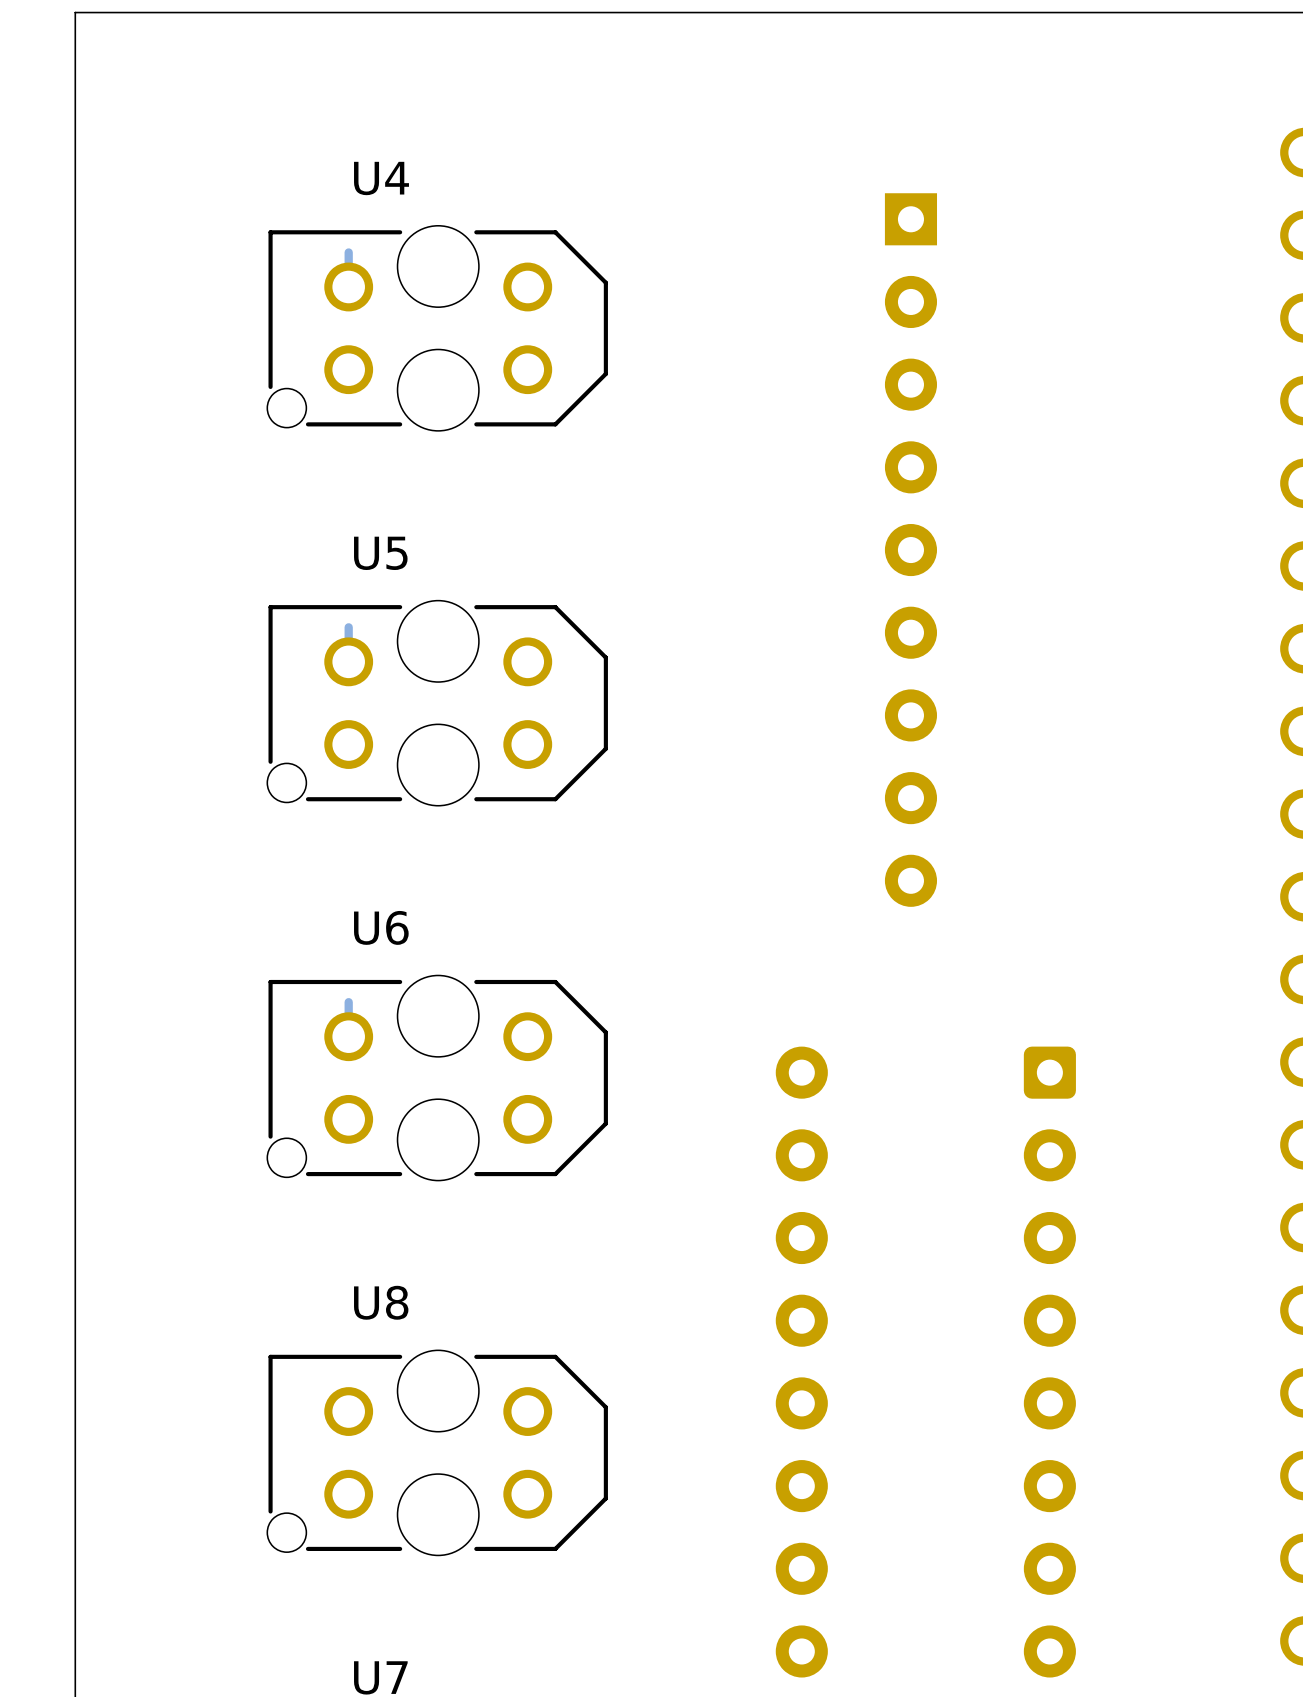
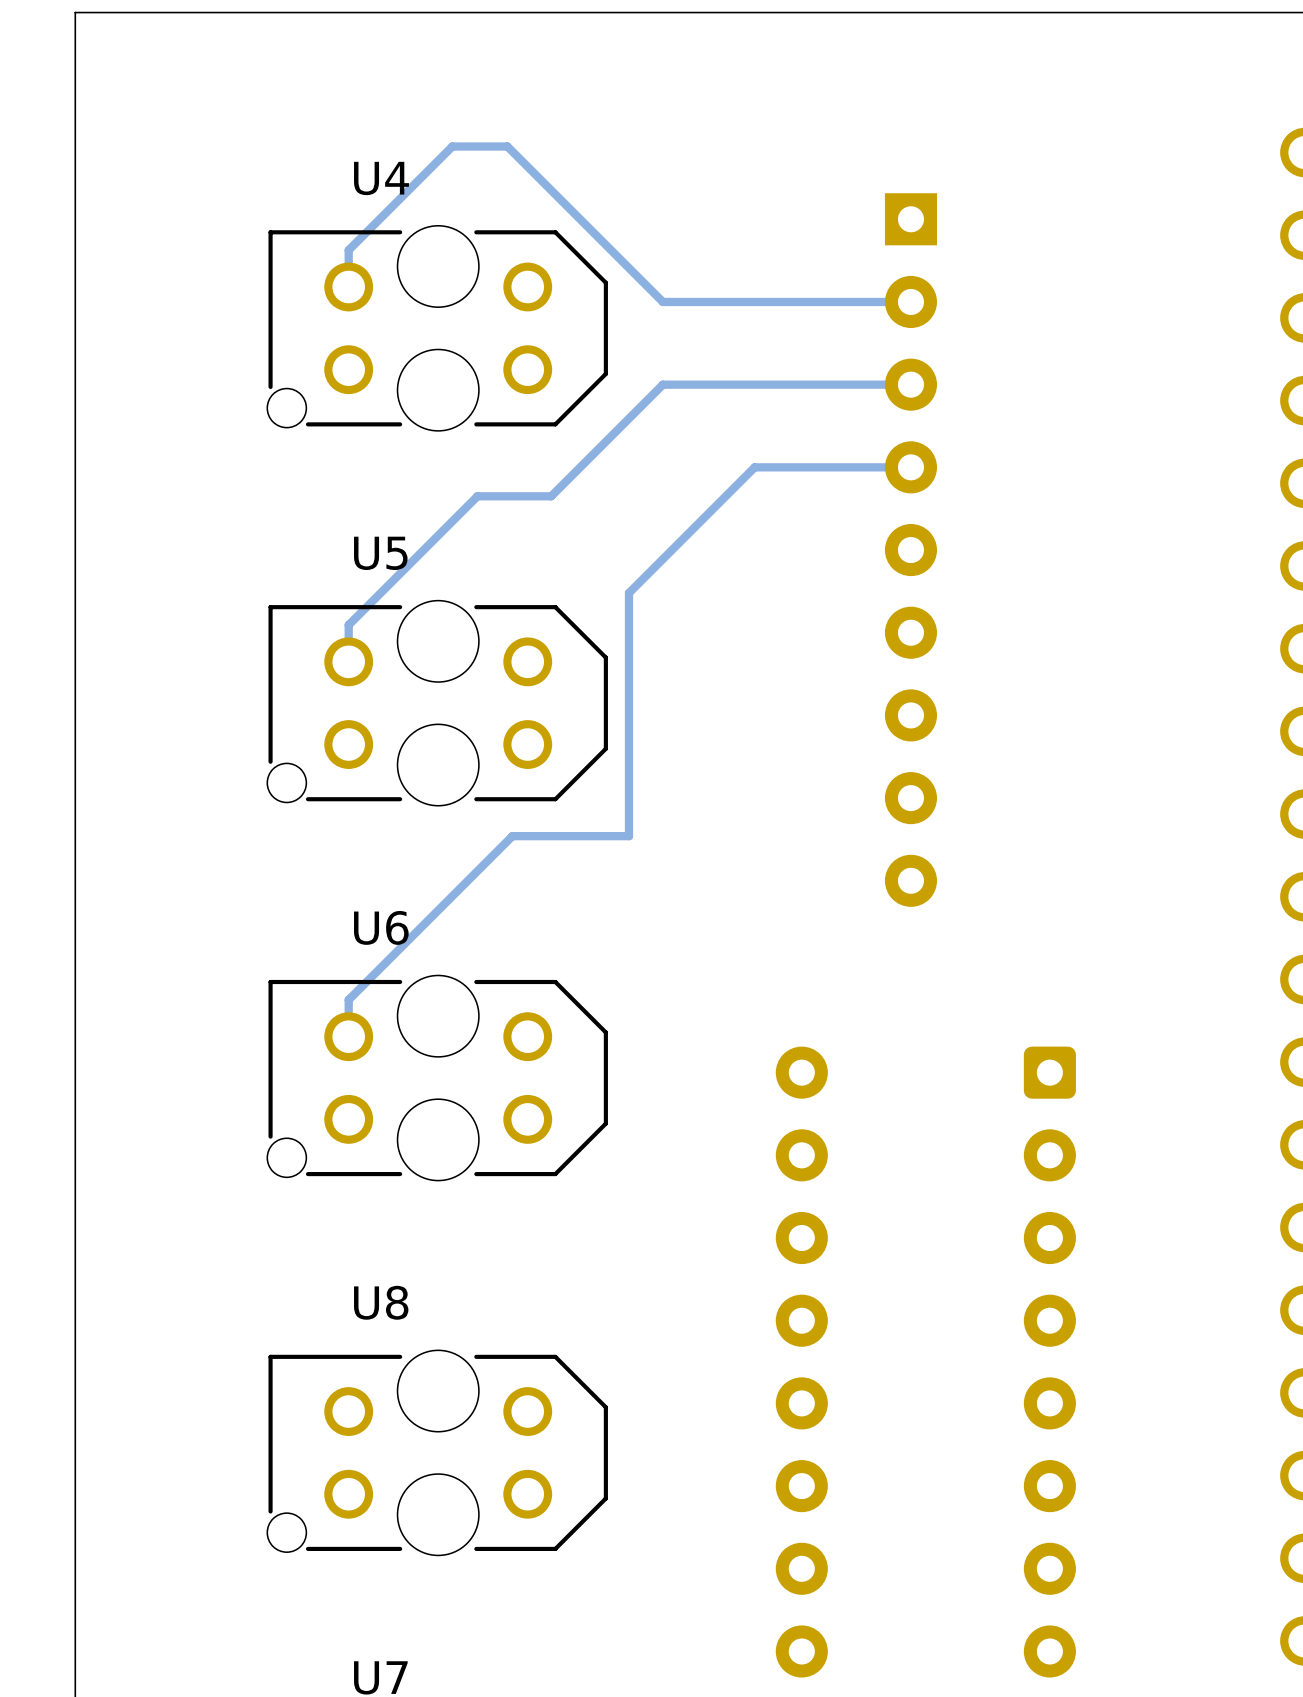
track: none -> (348, 252) (348, 250) (452, 146) (507, 146) (662, 301) (910, 301)
track: none -> (910, 384) (662, 384) (551, 496) (477, 496) (348, 625) (348, 627)
track: none -> (910, 467) (754, 467) (628, 593) (628, 836) (512, 836) (348, 999) (348, 1002)

